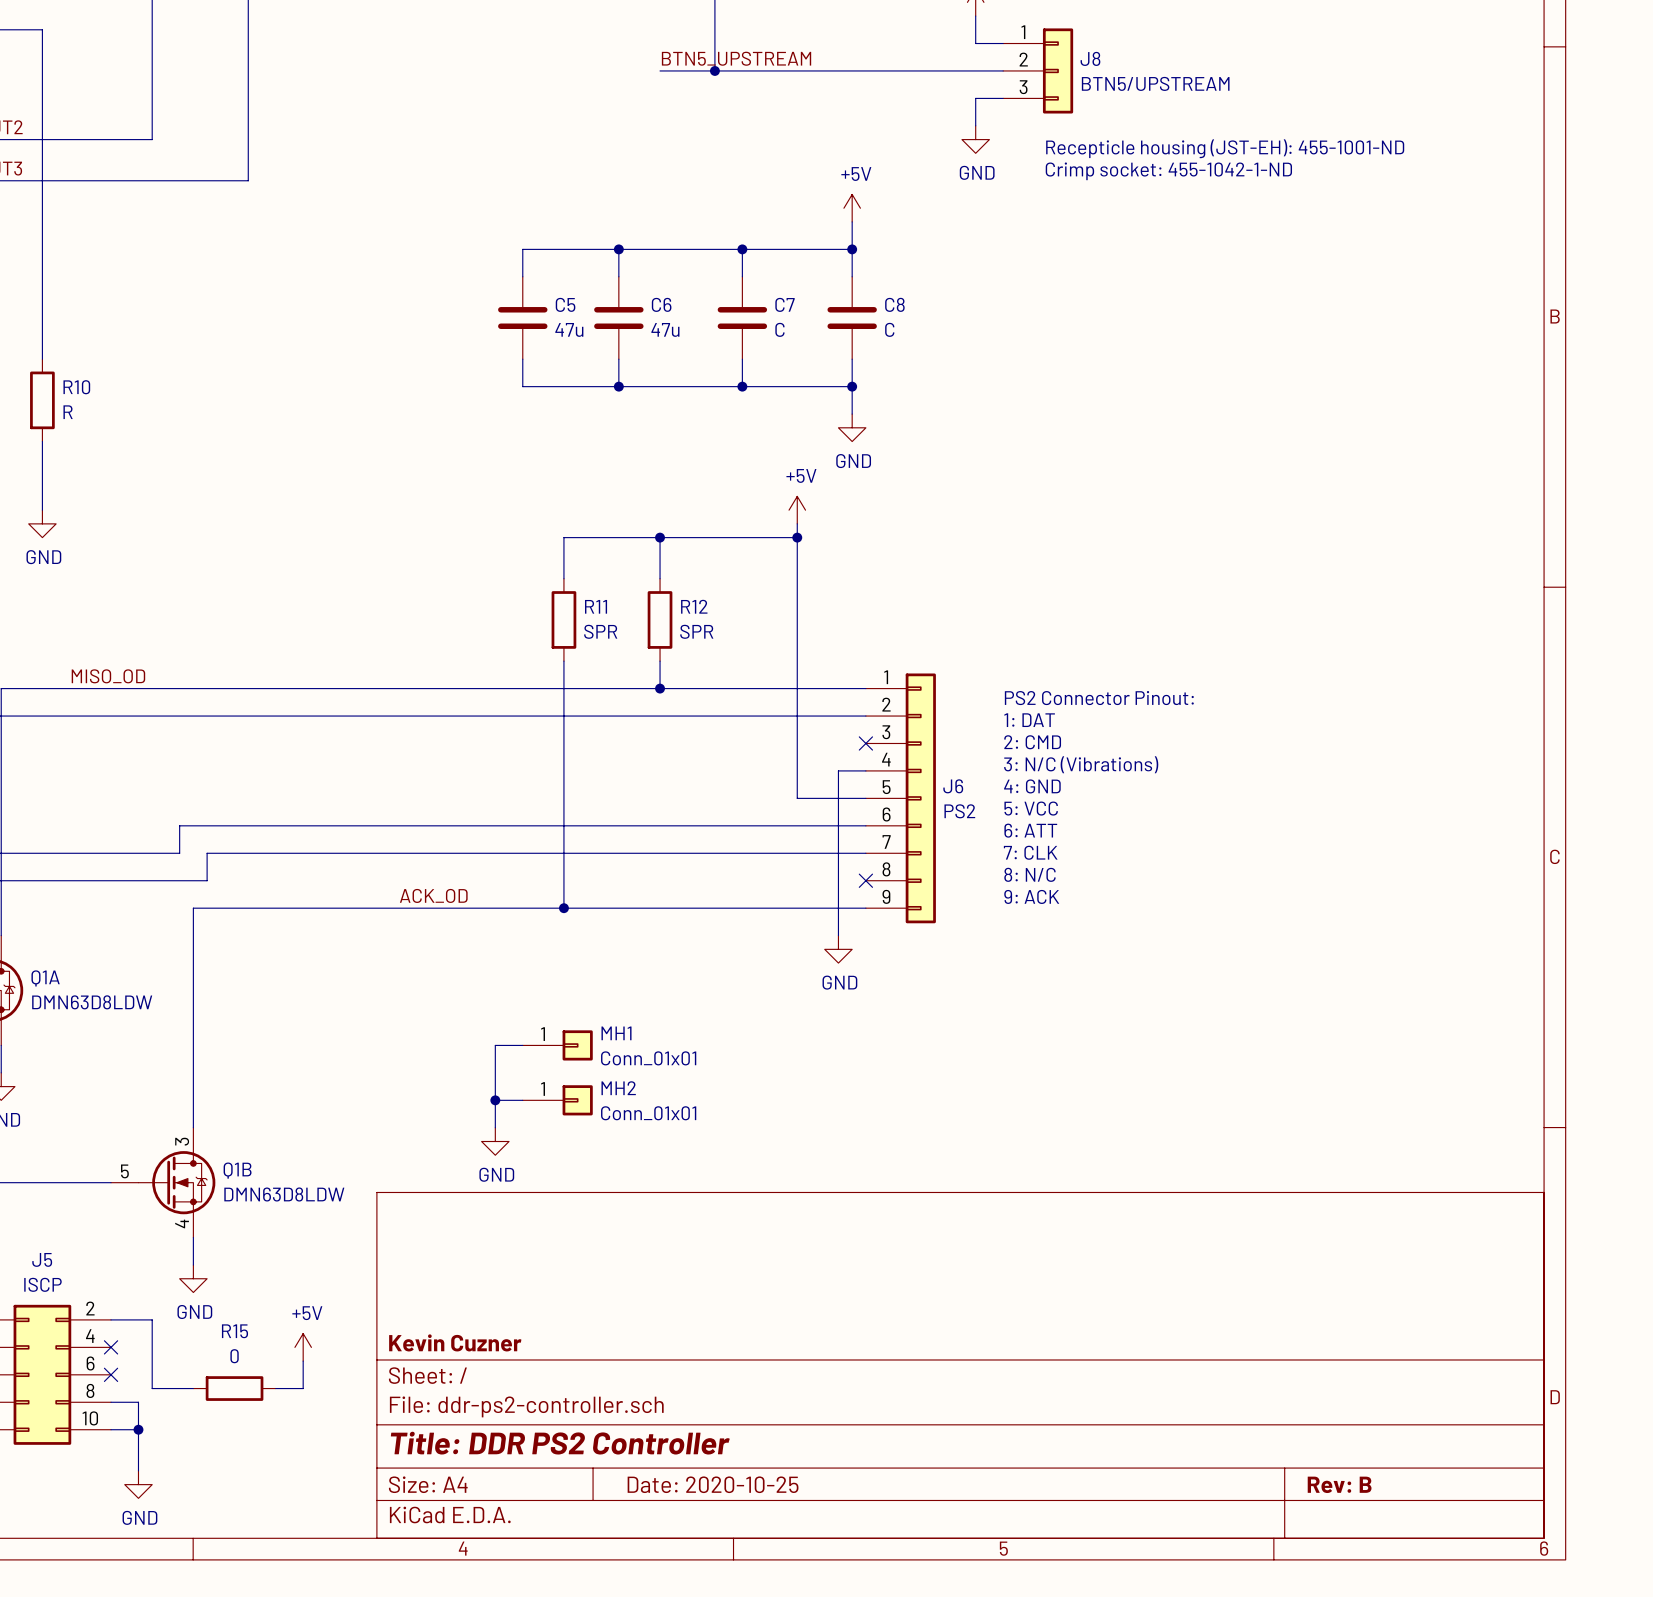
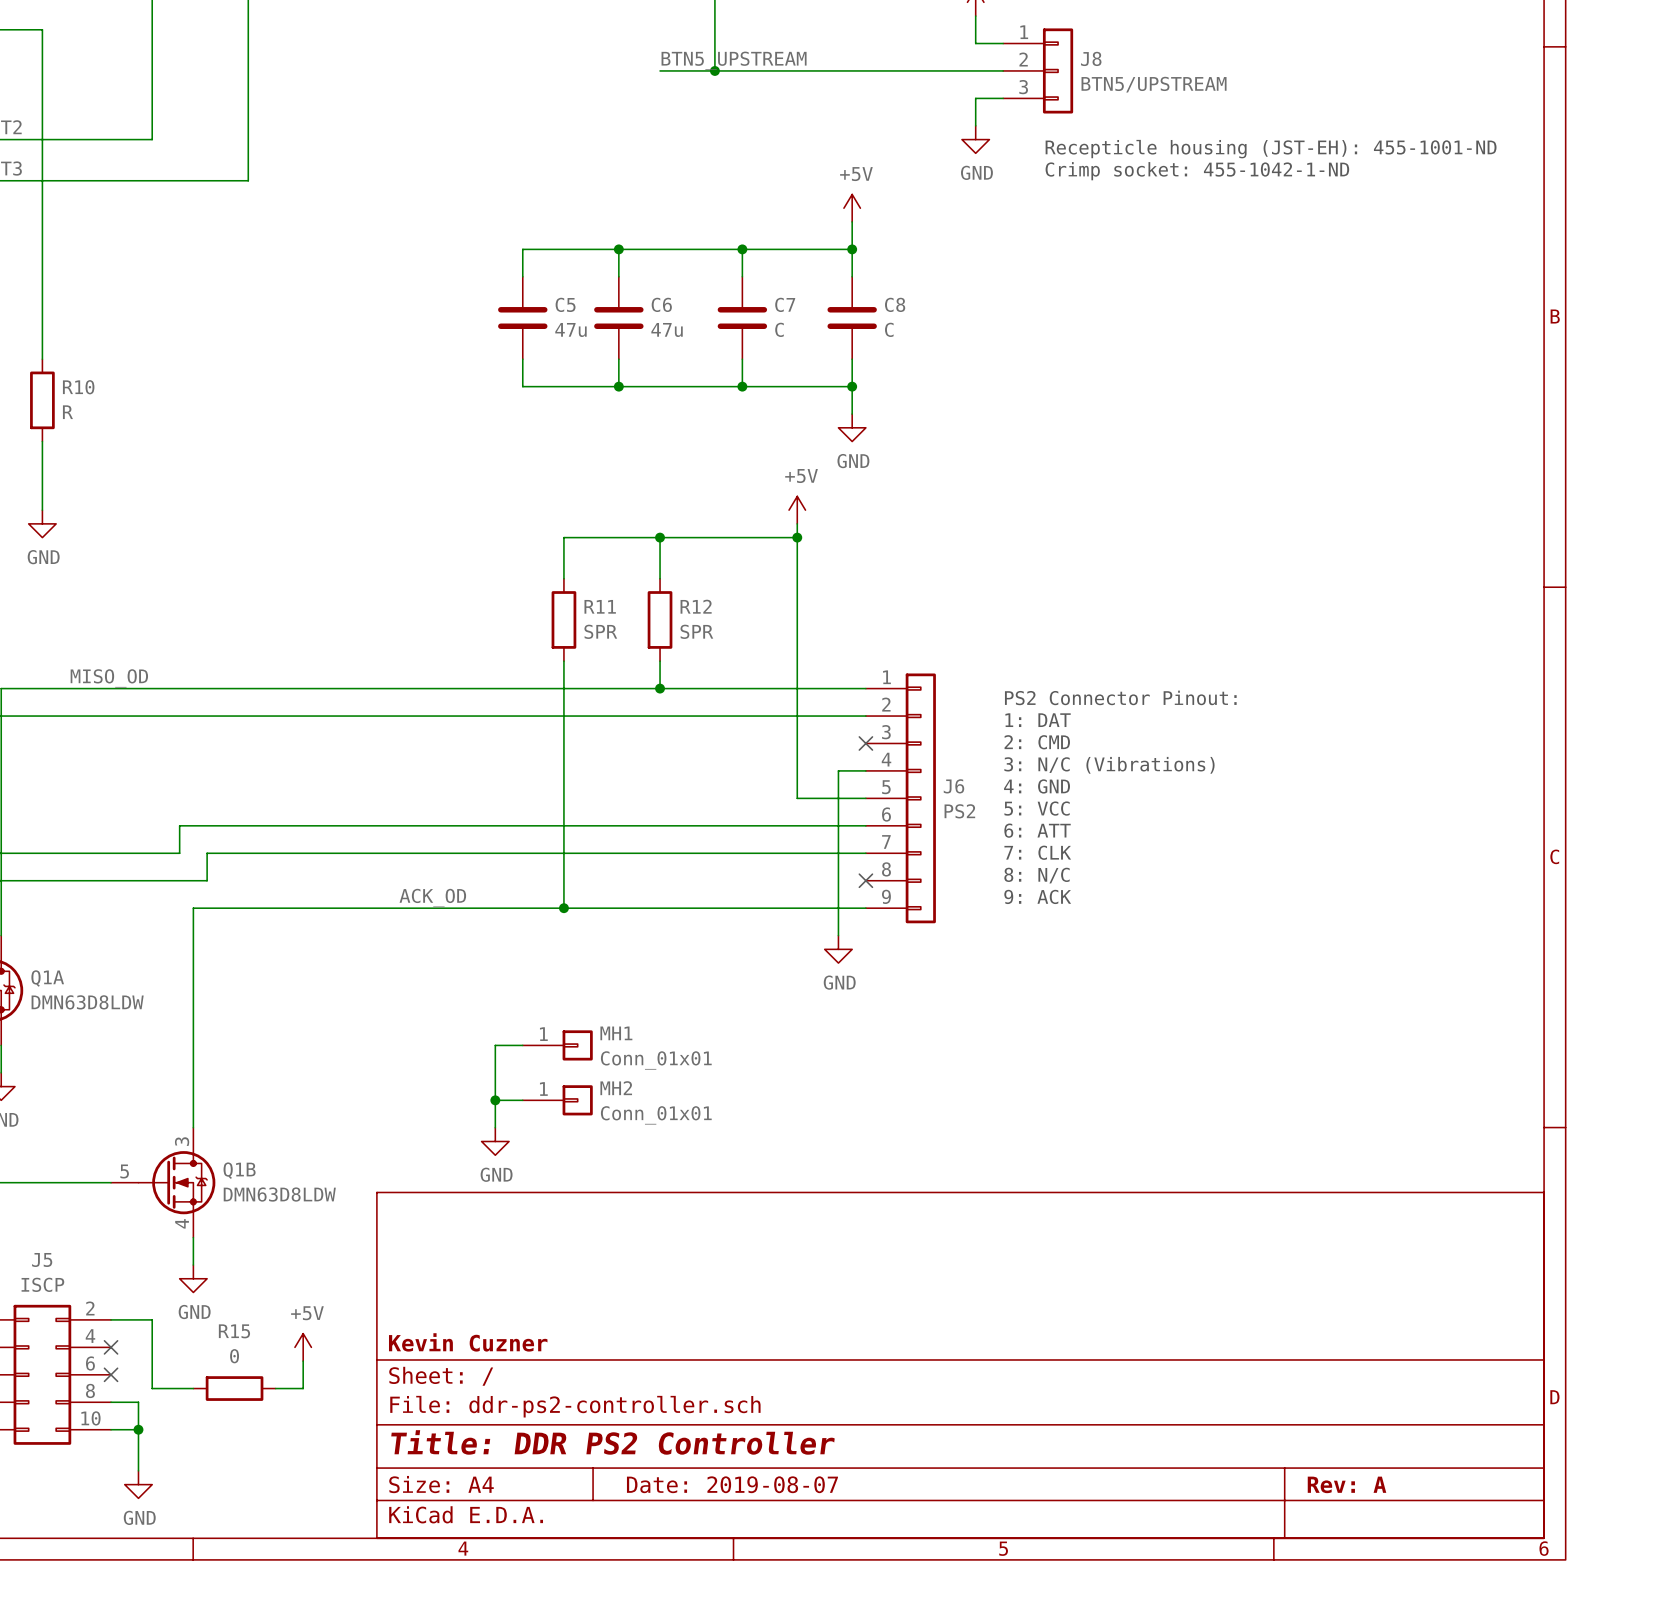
title block: Date: 2020-10-25 (713, 1484) -> Date: 2019-08-07 (732, 1484)
title block: Rev: B (1339, 1484) -> Rev: A (1347, 1484)

